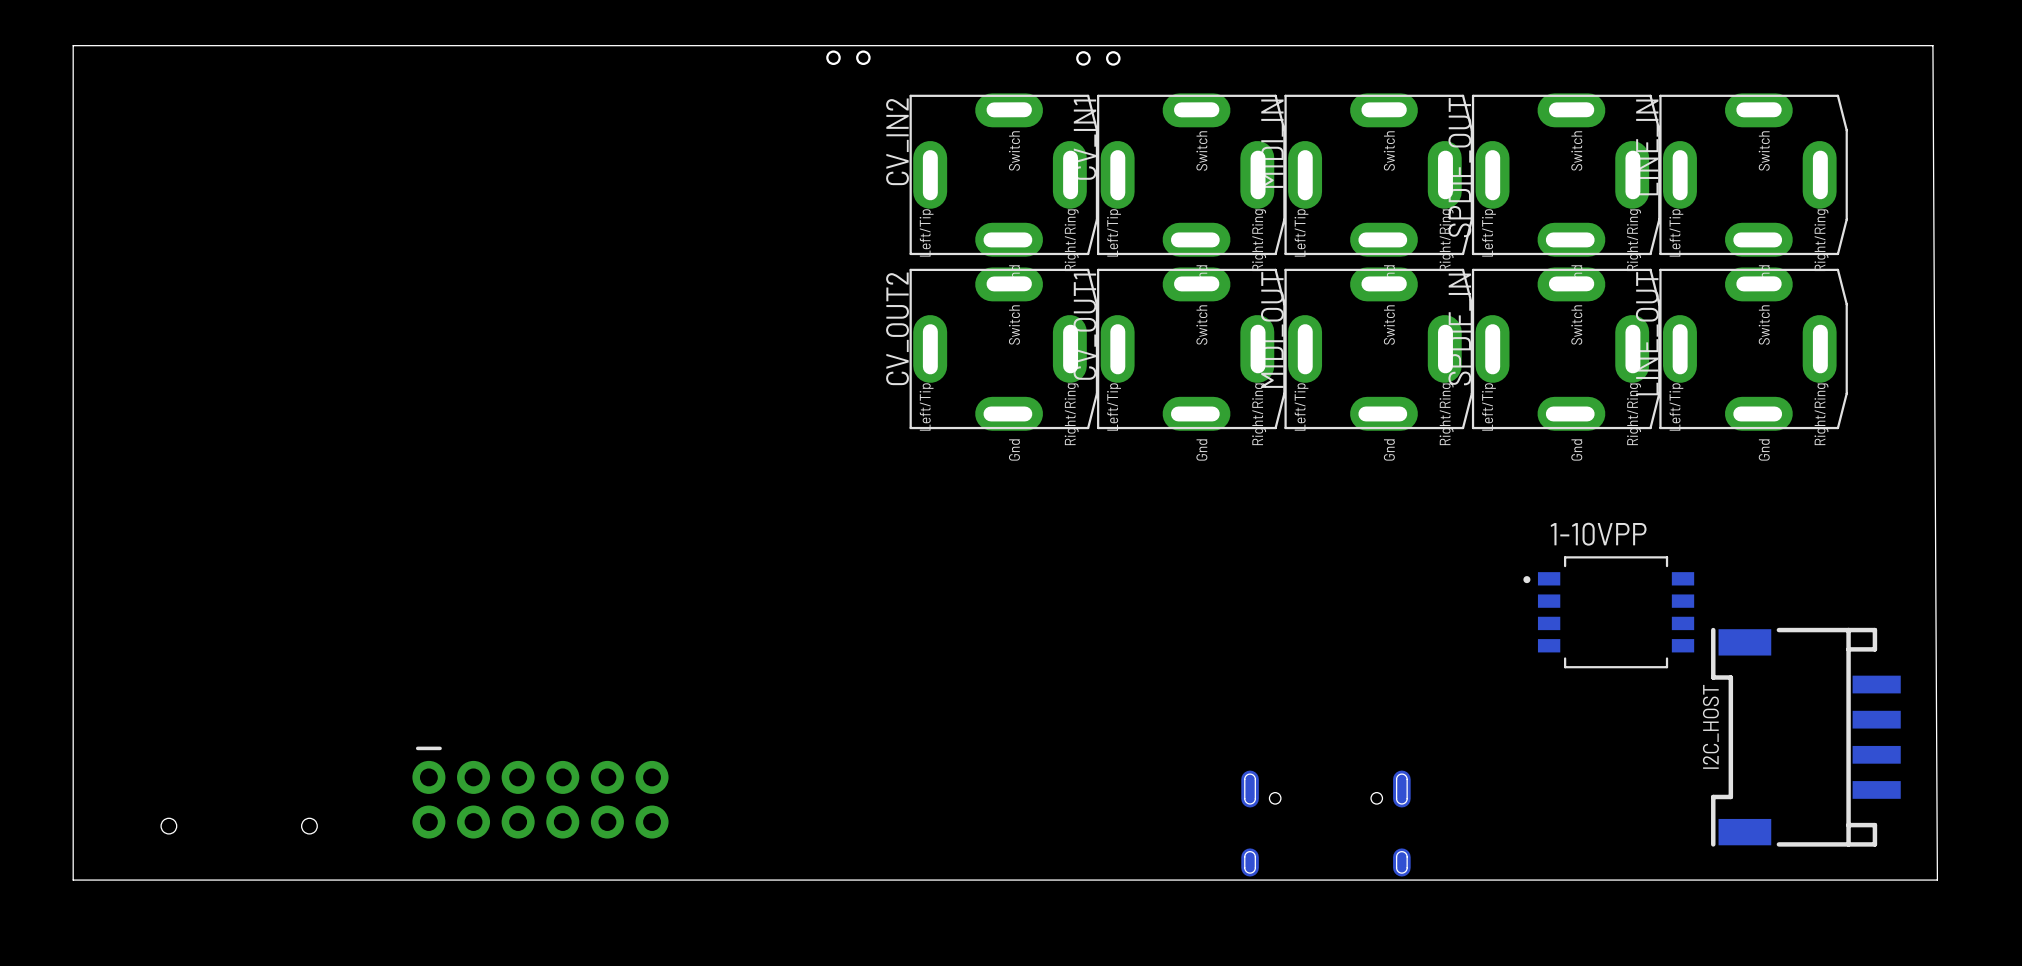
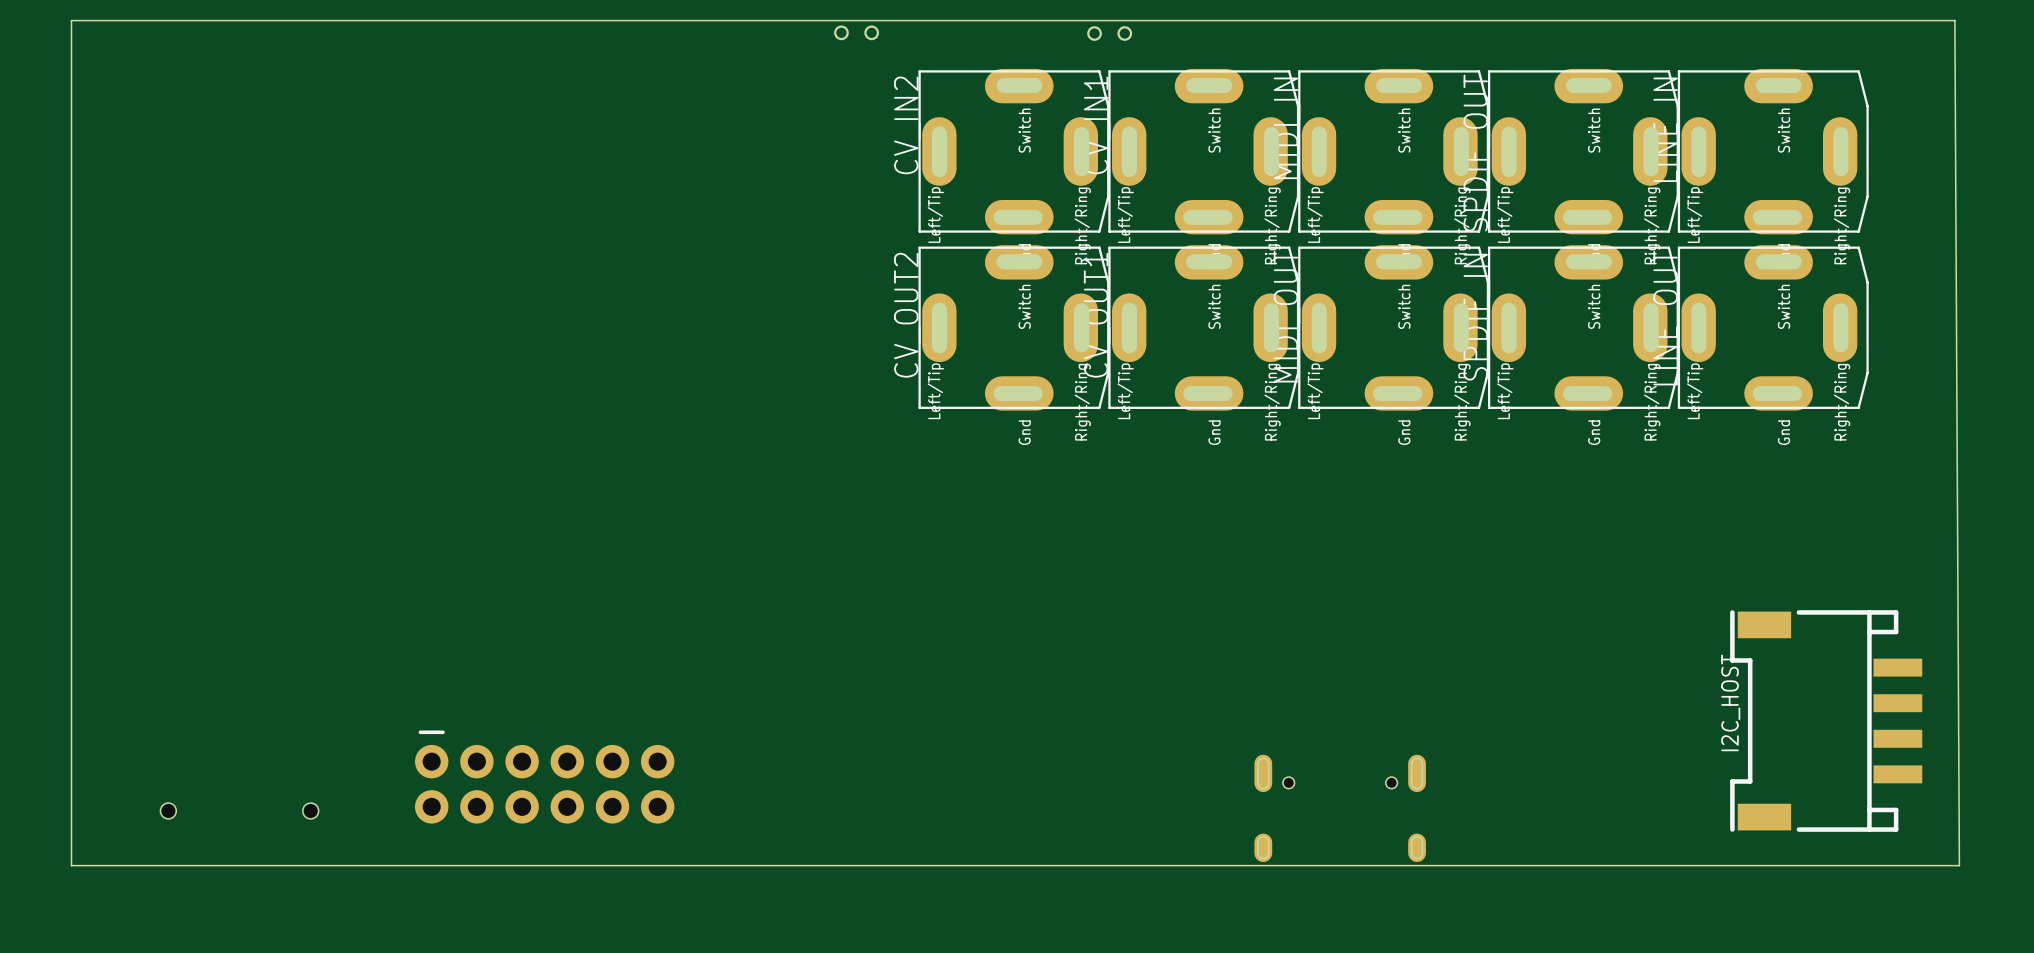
1-10VPP: (1608, 612) -> none

